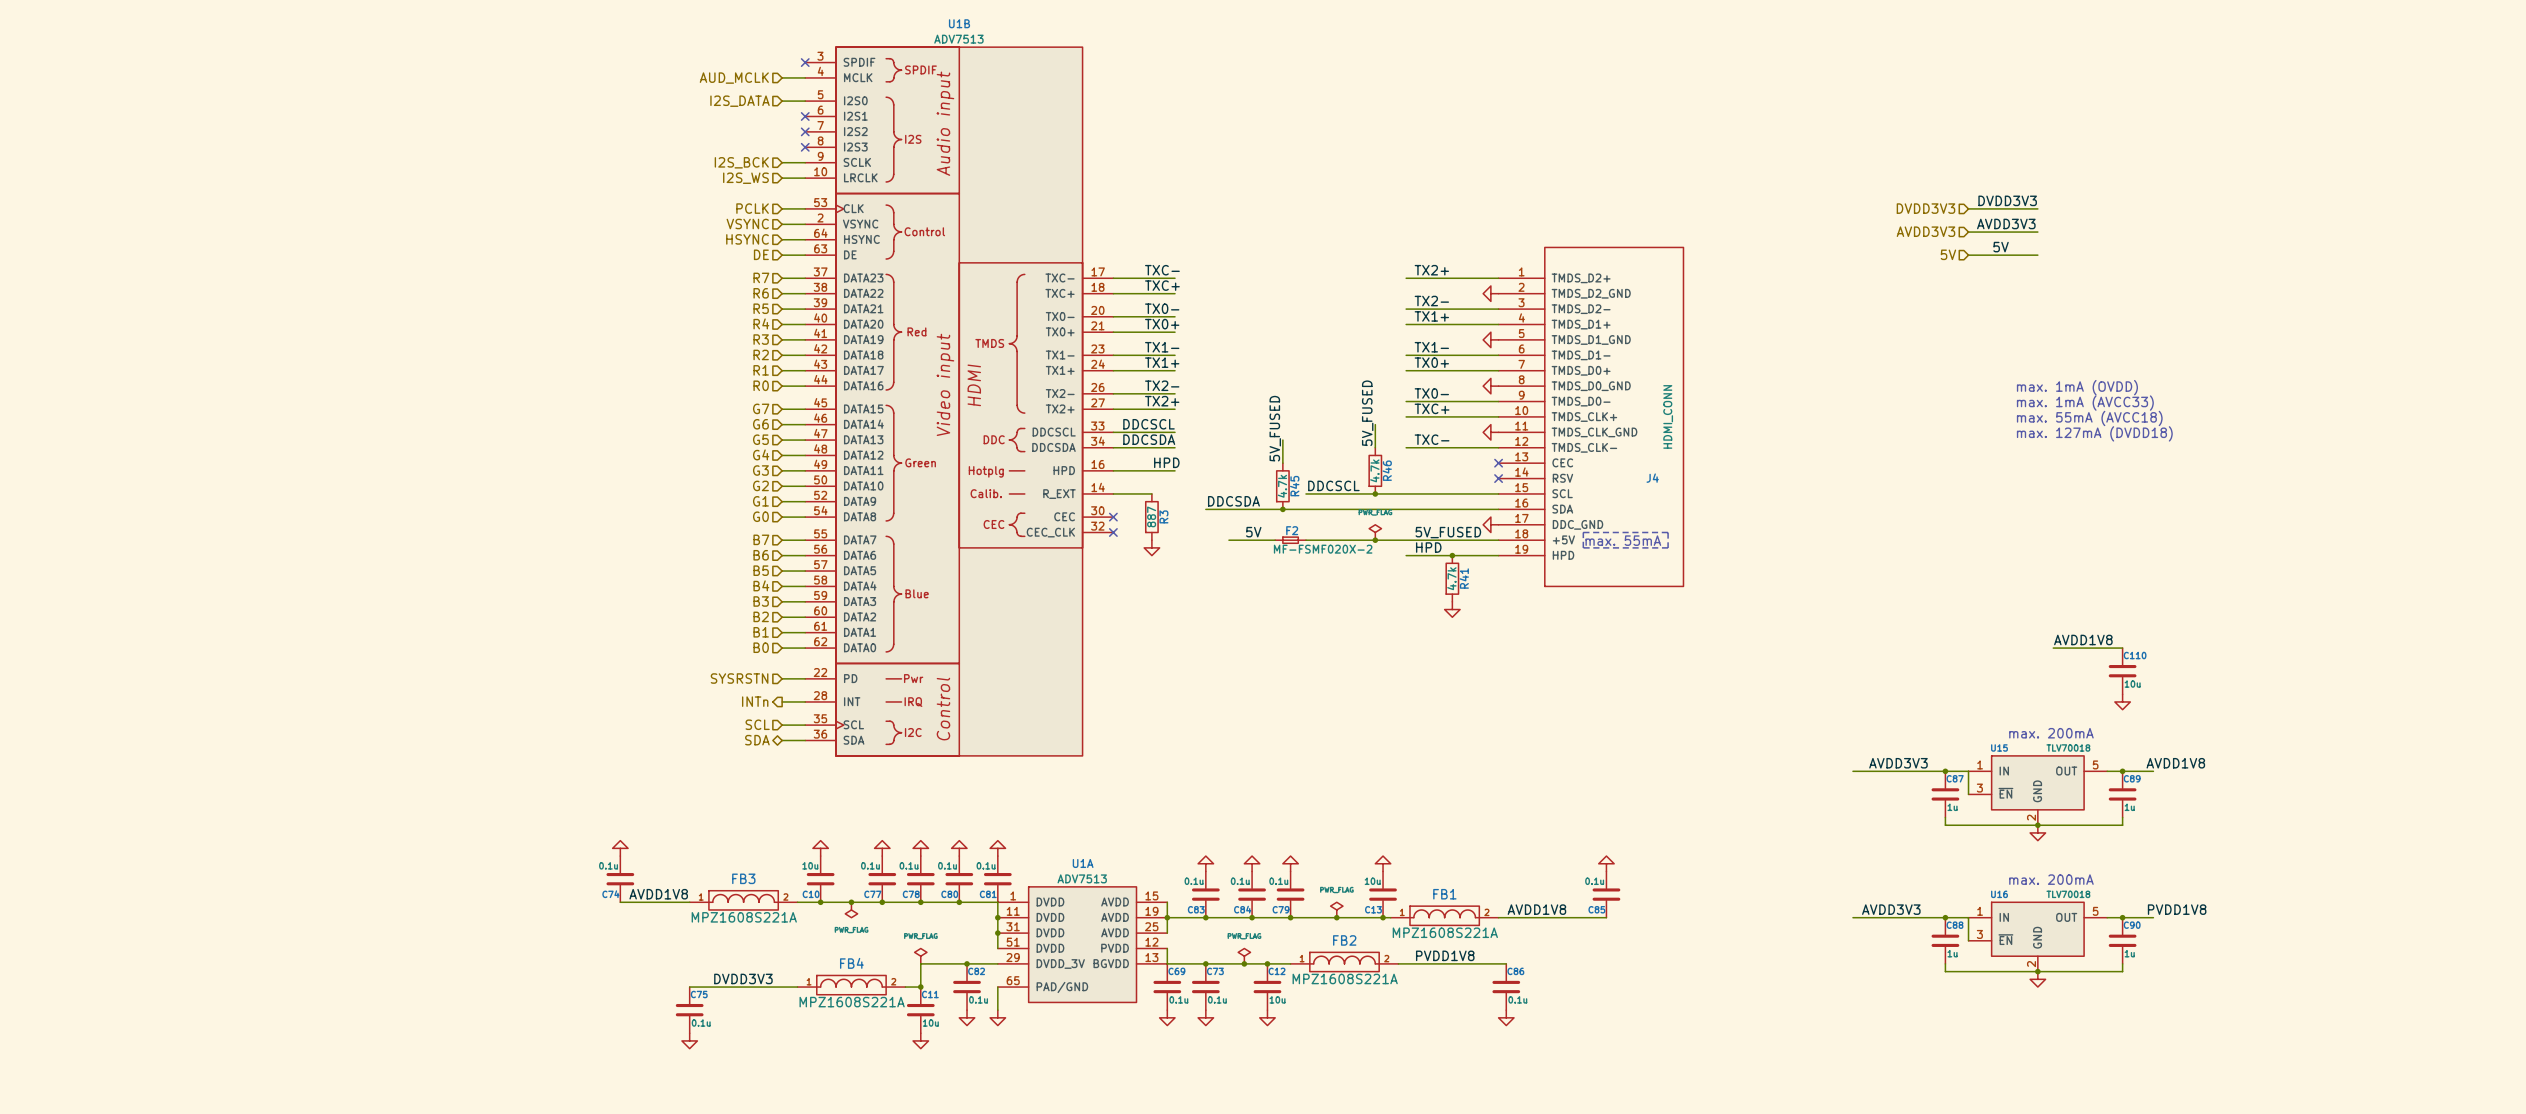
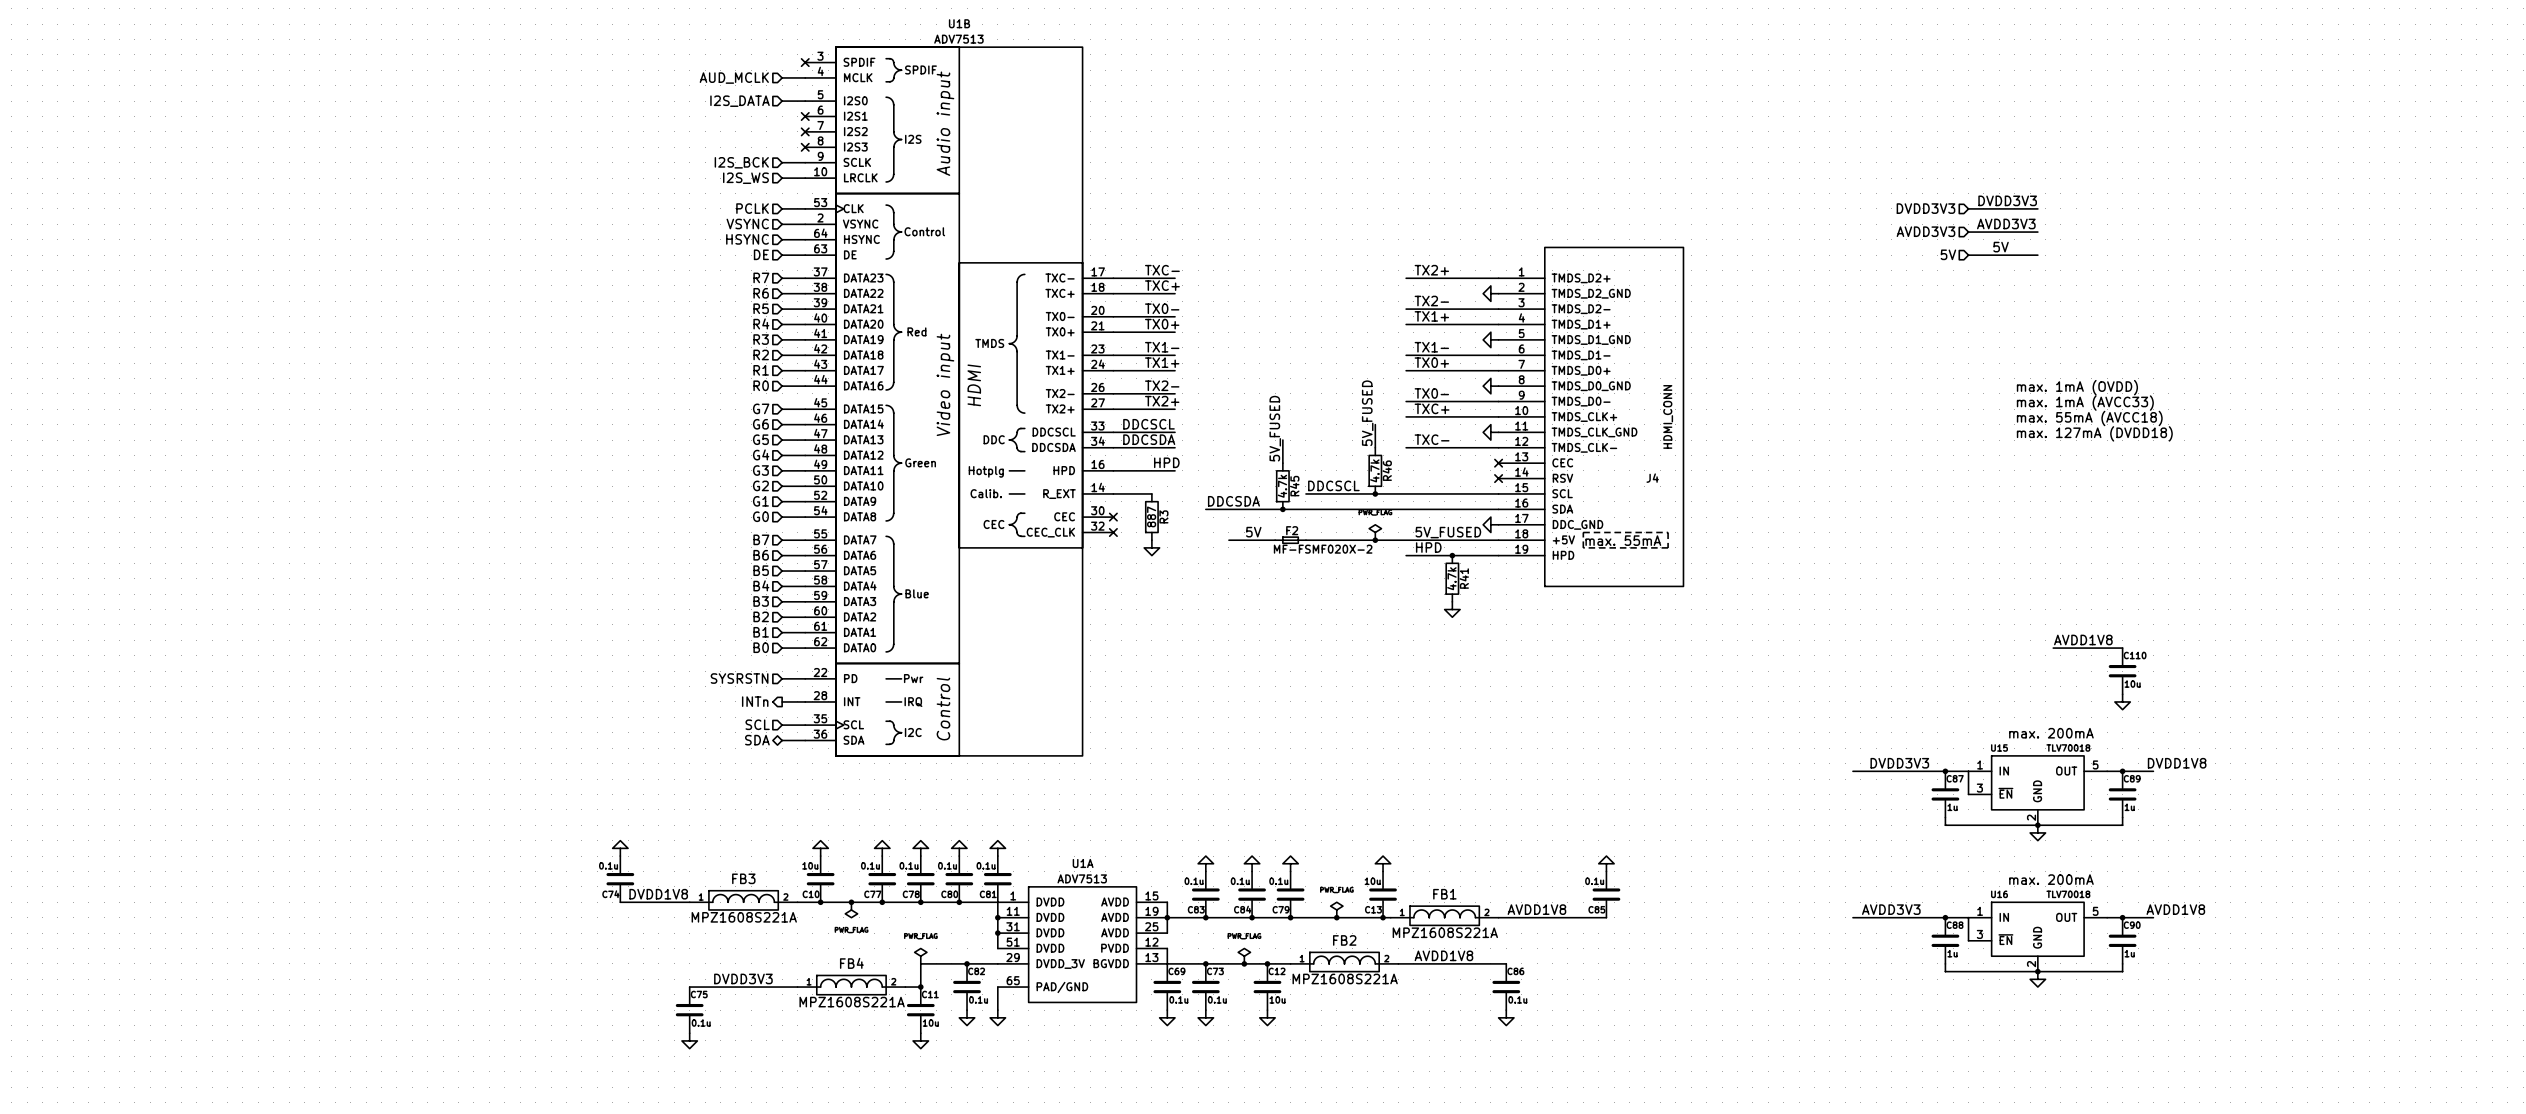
label: AVDD3V3 (1898, 763) -> DVDD3V3 (1899, 763)
label: AVDD1V8 (2175, 763) -> DVDD1V8 (2177, 763)
label: AVDD1V8 (658, 894) -> DVDD1V8 (658, 894)
label: PVDD1V8 (2177, 909) -> AVDD1V8 (2175, 909)
label: PVDD1V8 (1445, 955) -> AVDD1V8 (1443, 955)

